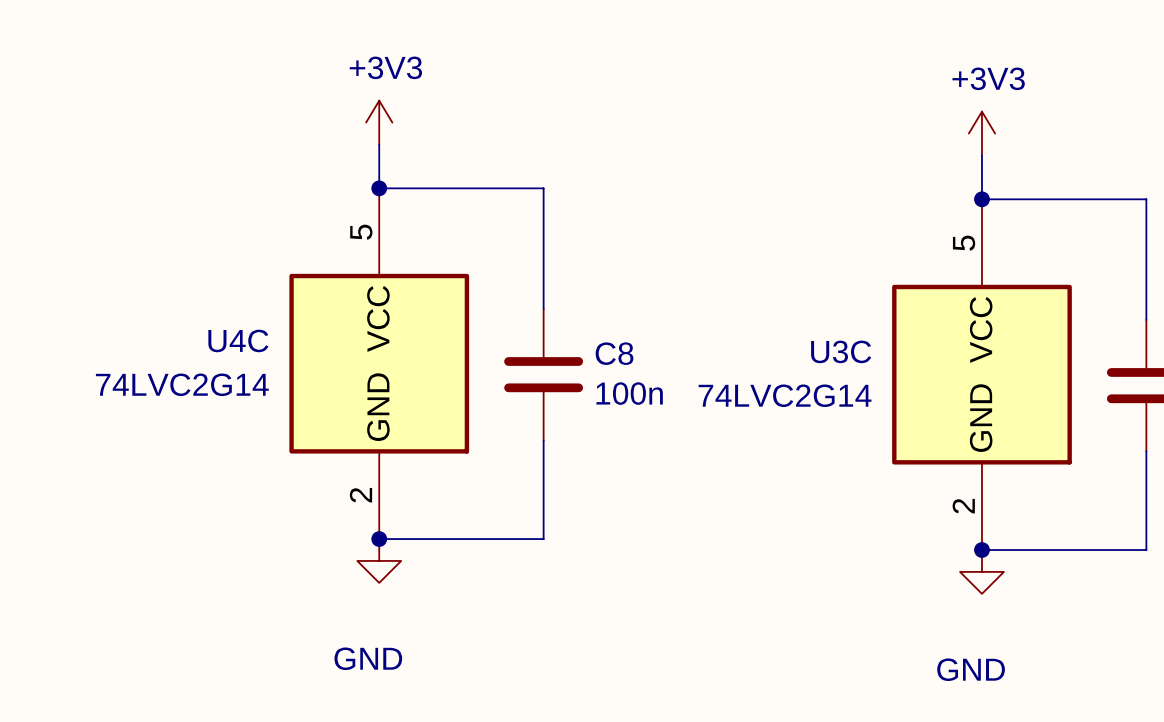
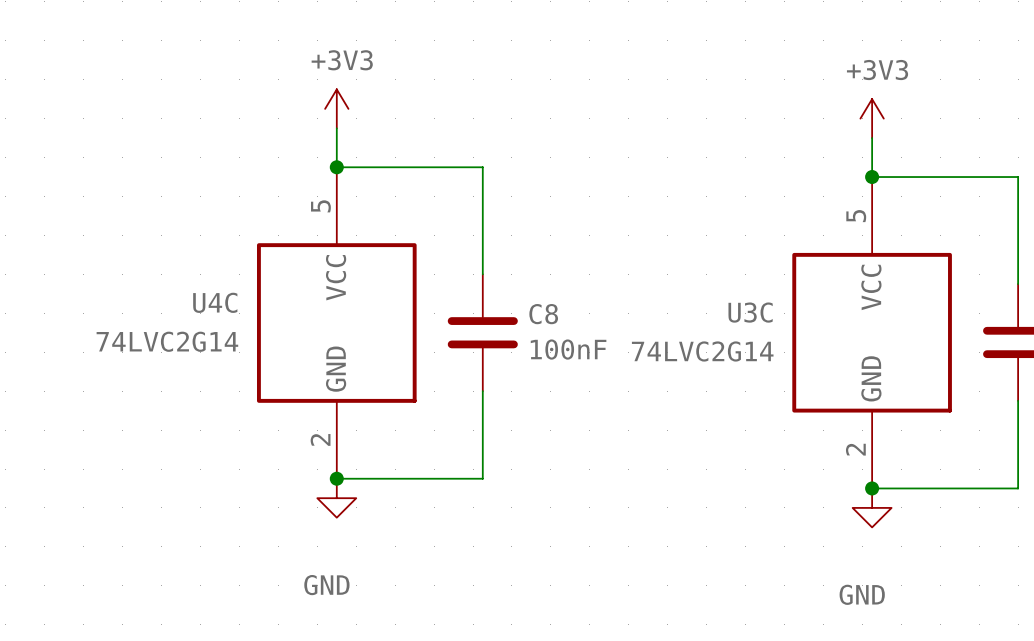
C8 value: 100n (629, 393) -> 100nF (568, 349)

